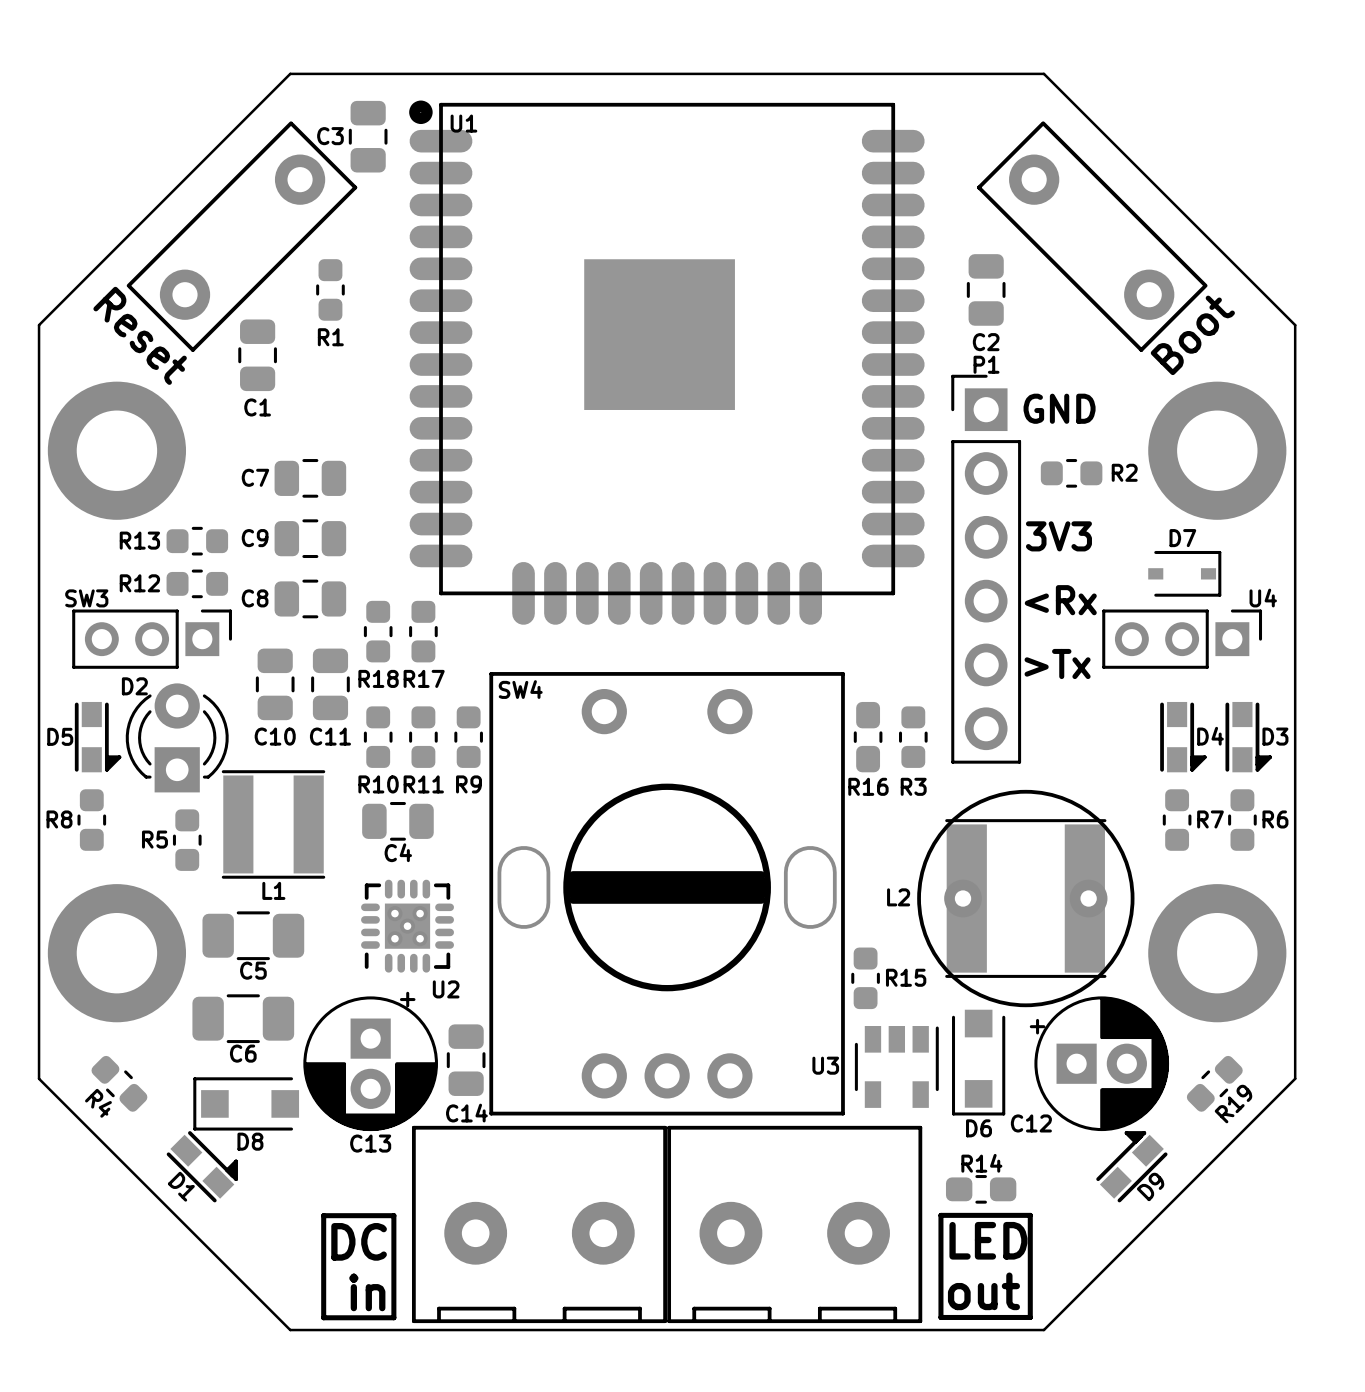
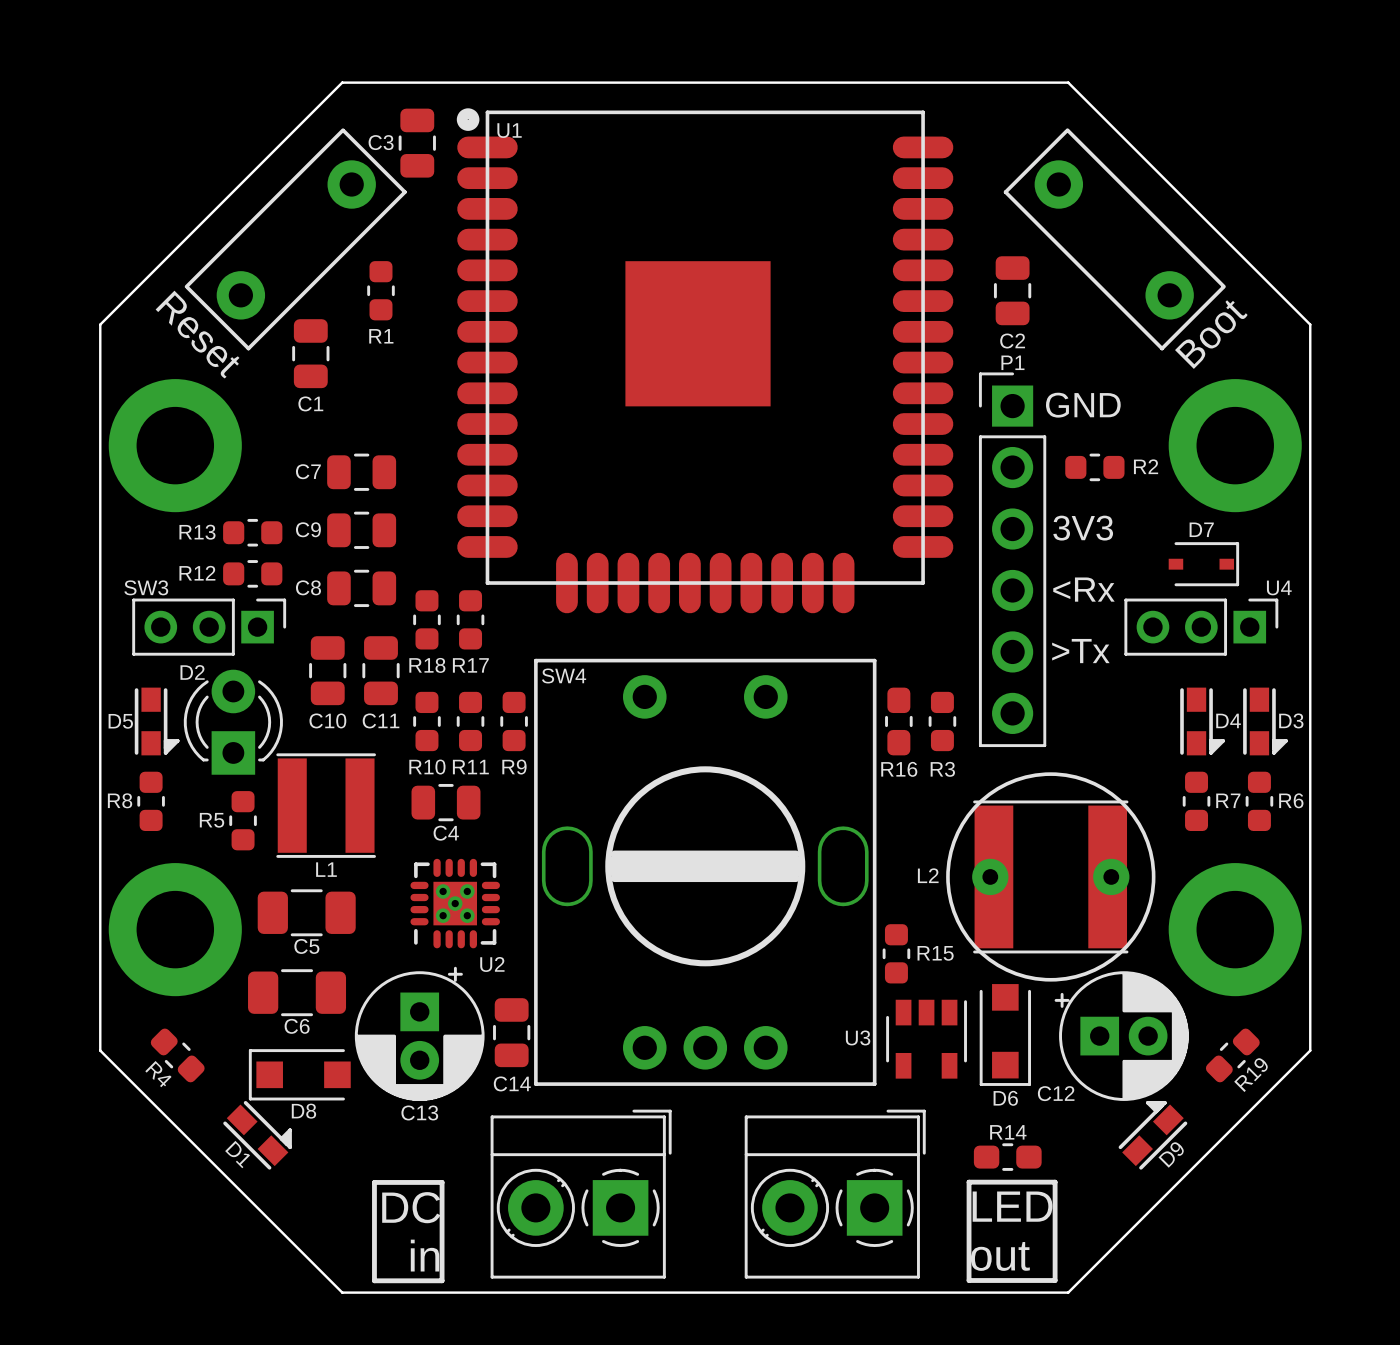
part footprint: [411, 1125, 667, 1324] -> [490, 1109, 672, 1279]
part footprint: [667, 1125, 923, 1324] -> [744, 1109, 926, 1279]

